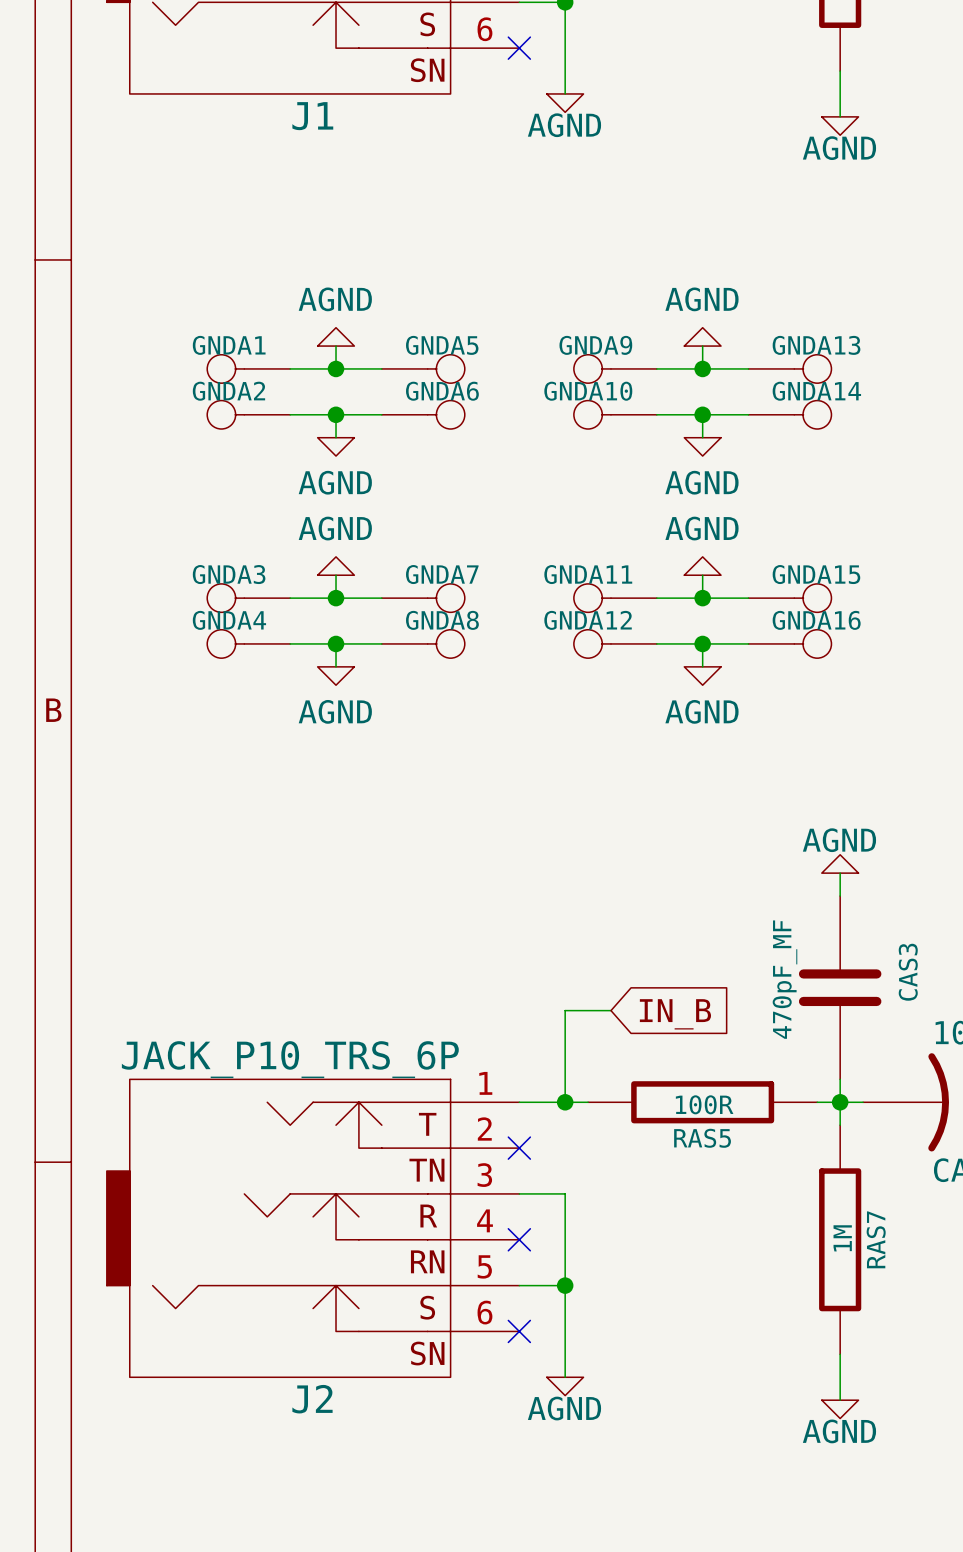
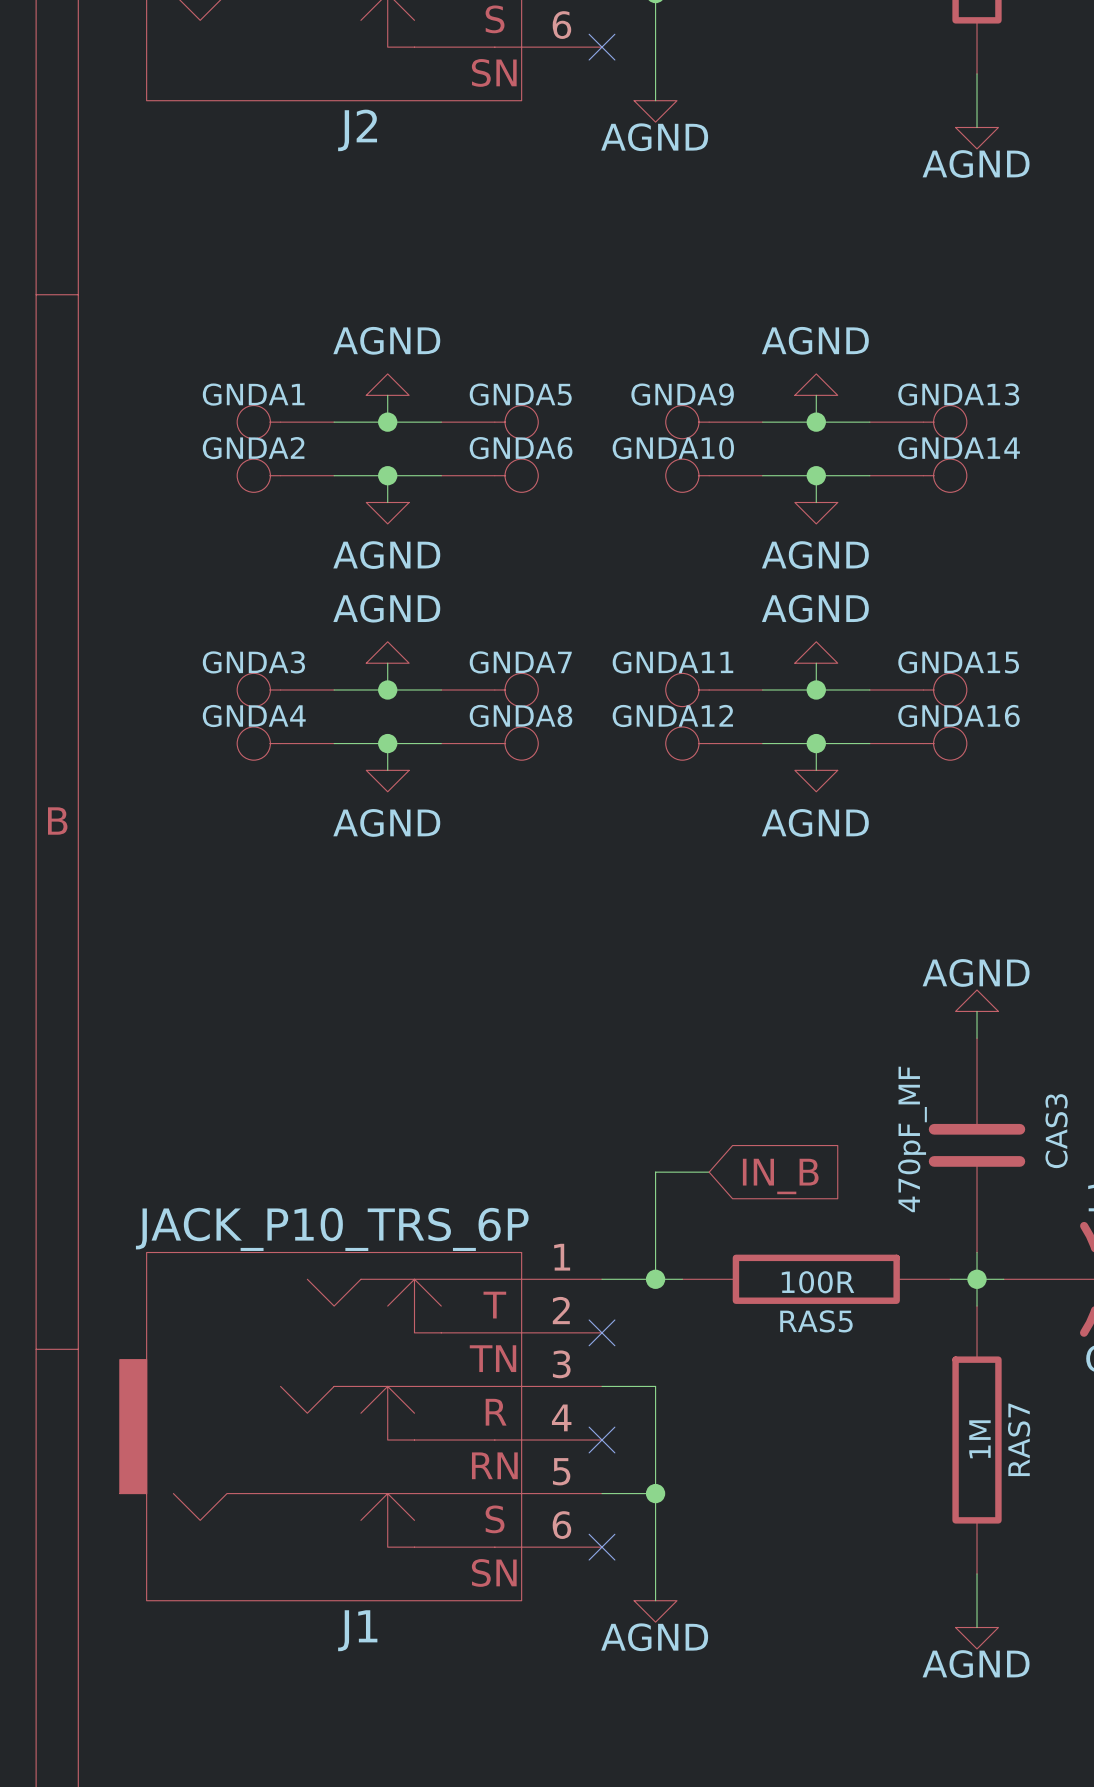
J1 name: J1 (312, 116) -> J2 (357, 130)
J2 name: J2 (312, 1399) -> J1 (357, 1630)

